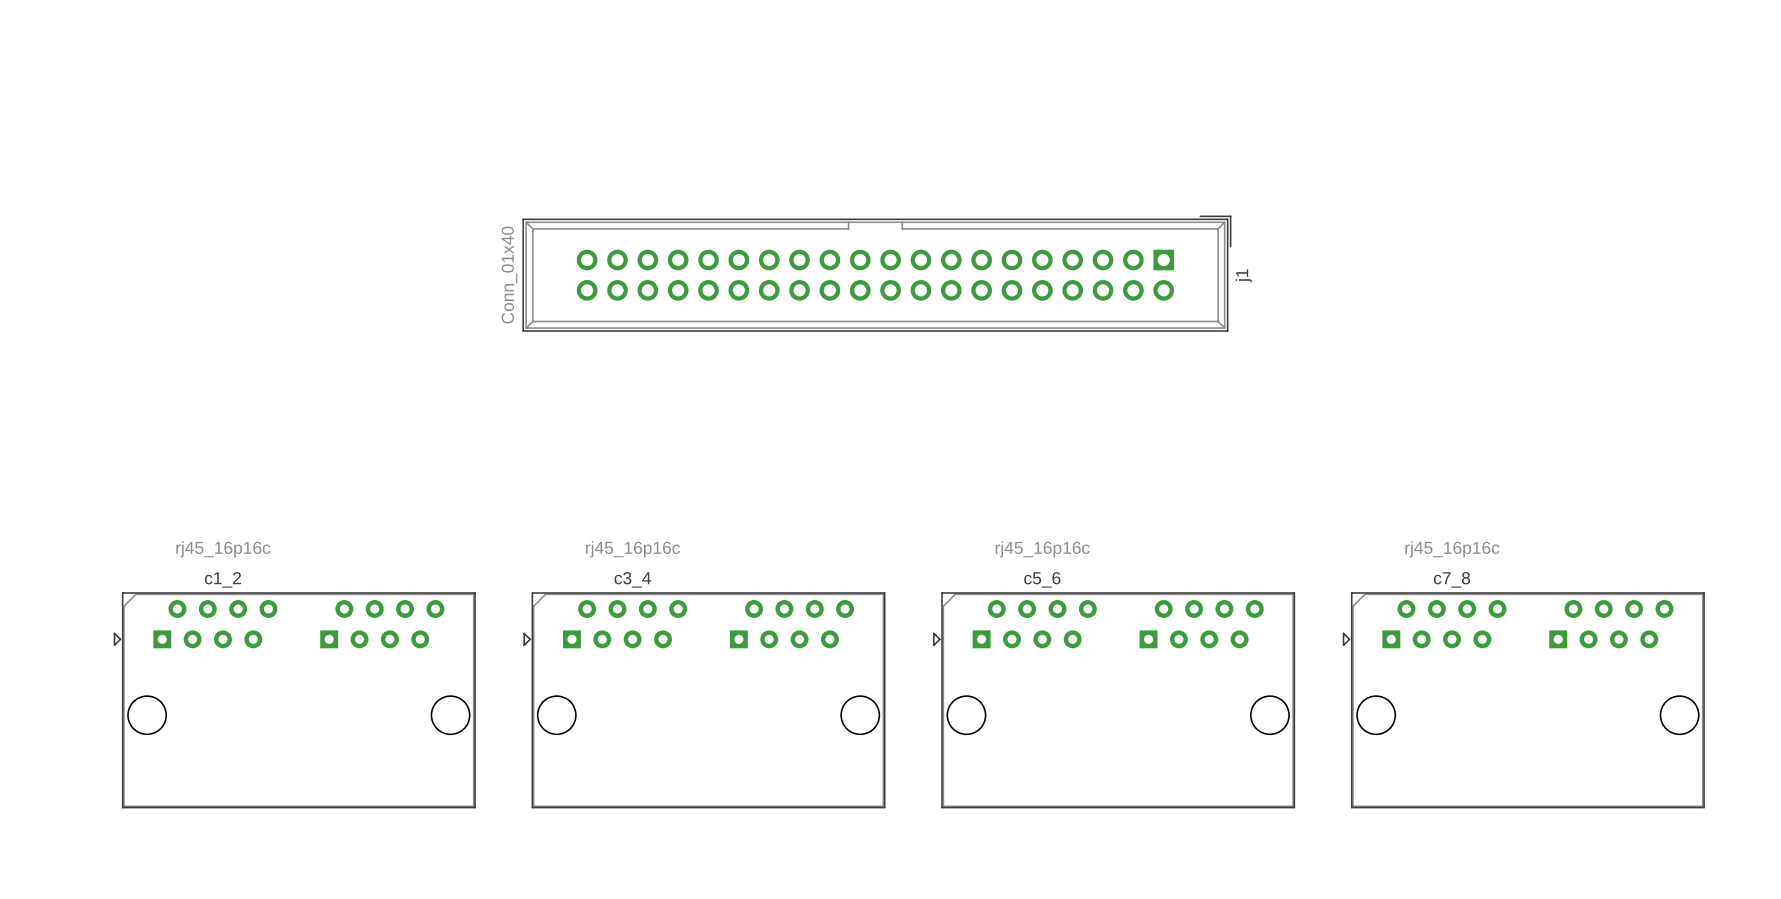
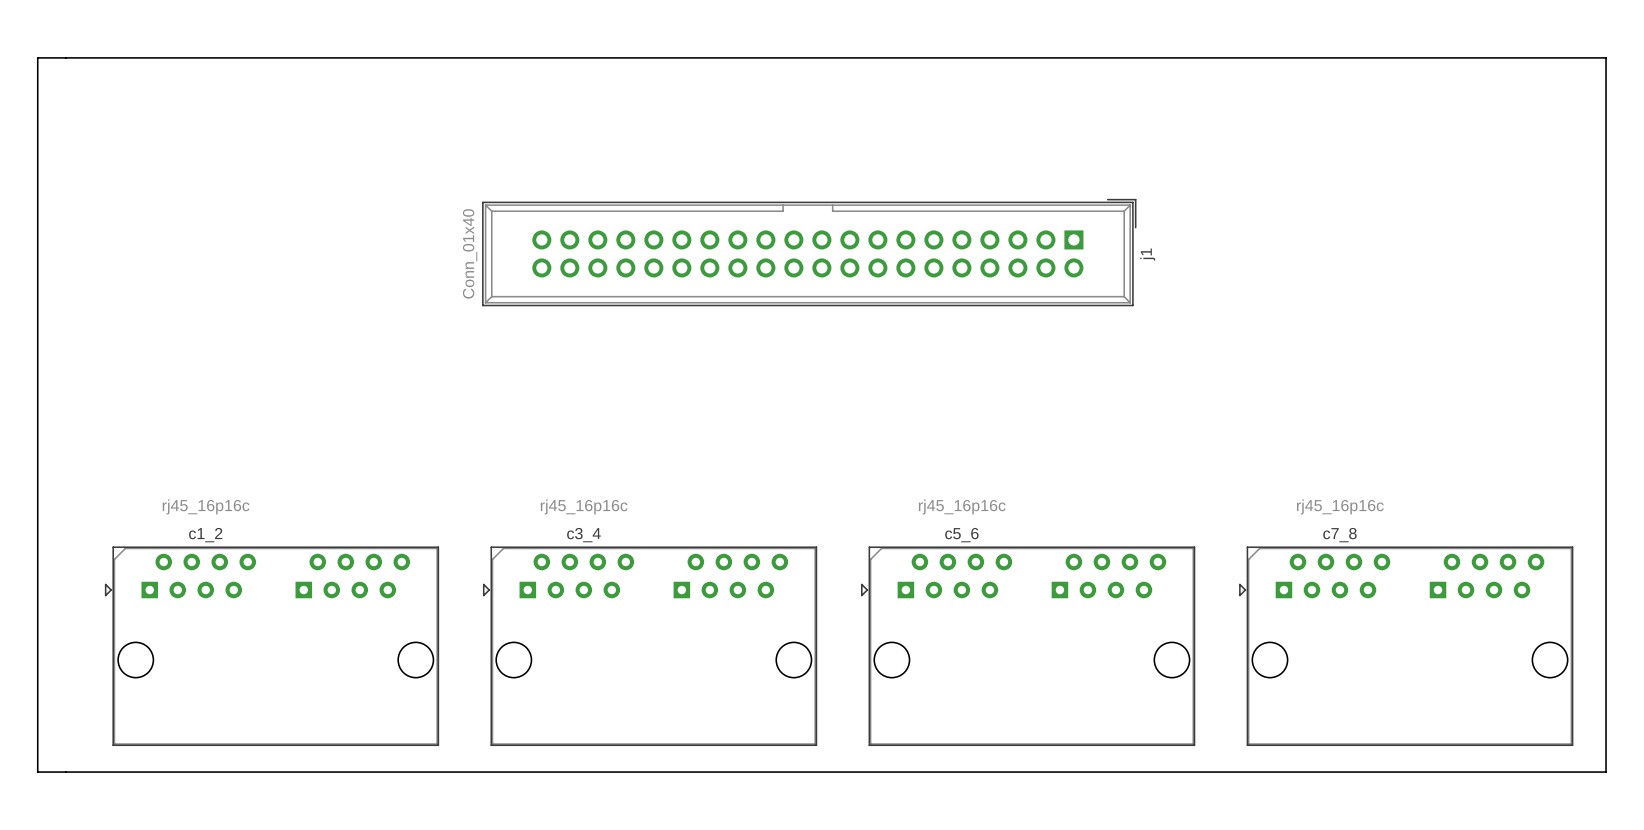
board edge: none -> (37, 57) (1606, 57) (1606, 772) (37, 772) (37, 57)

